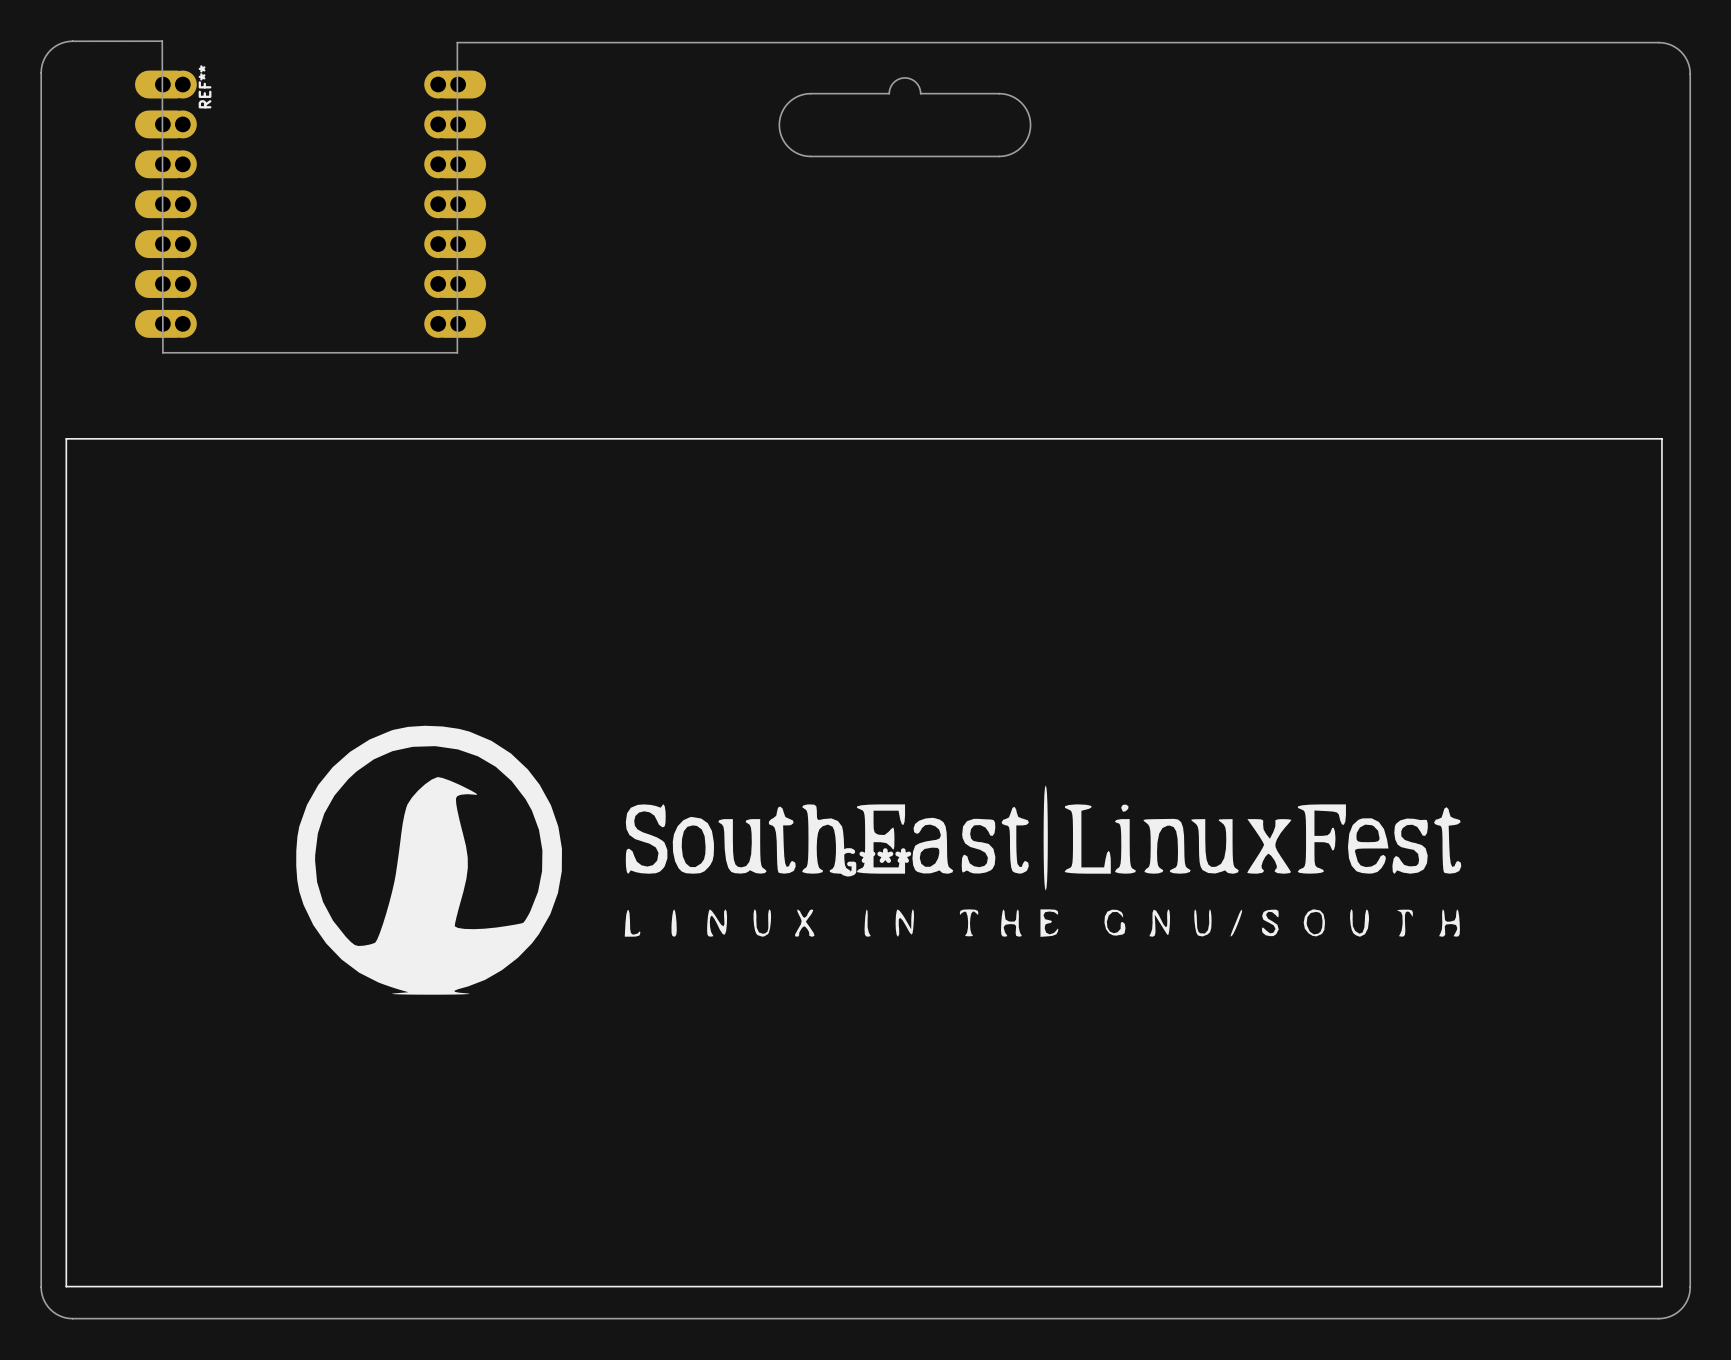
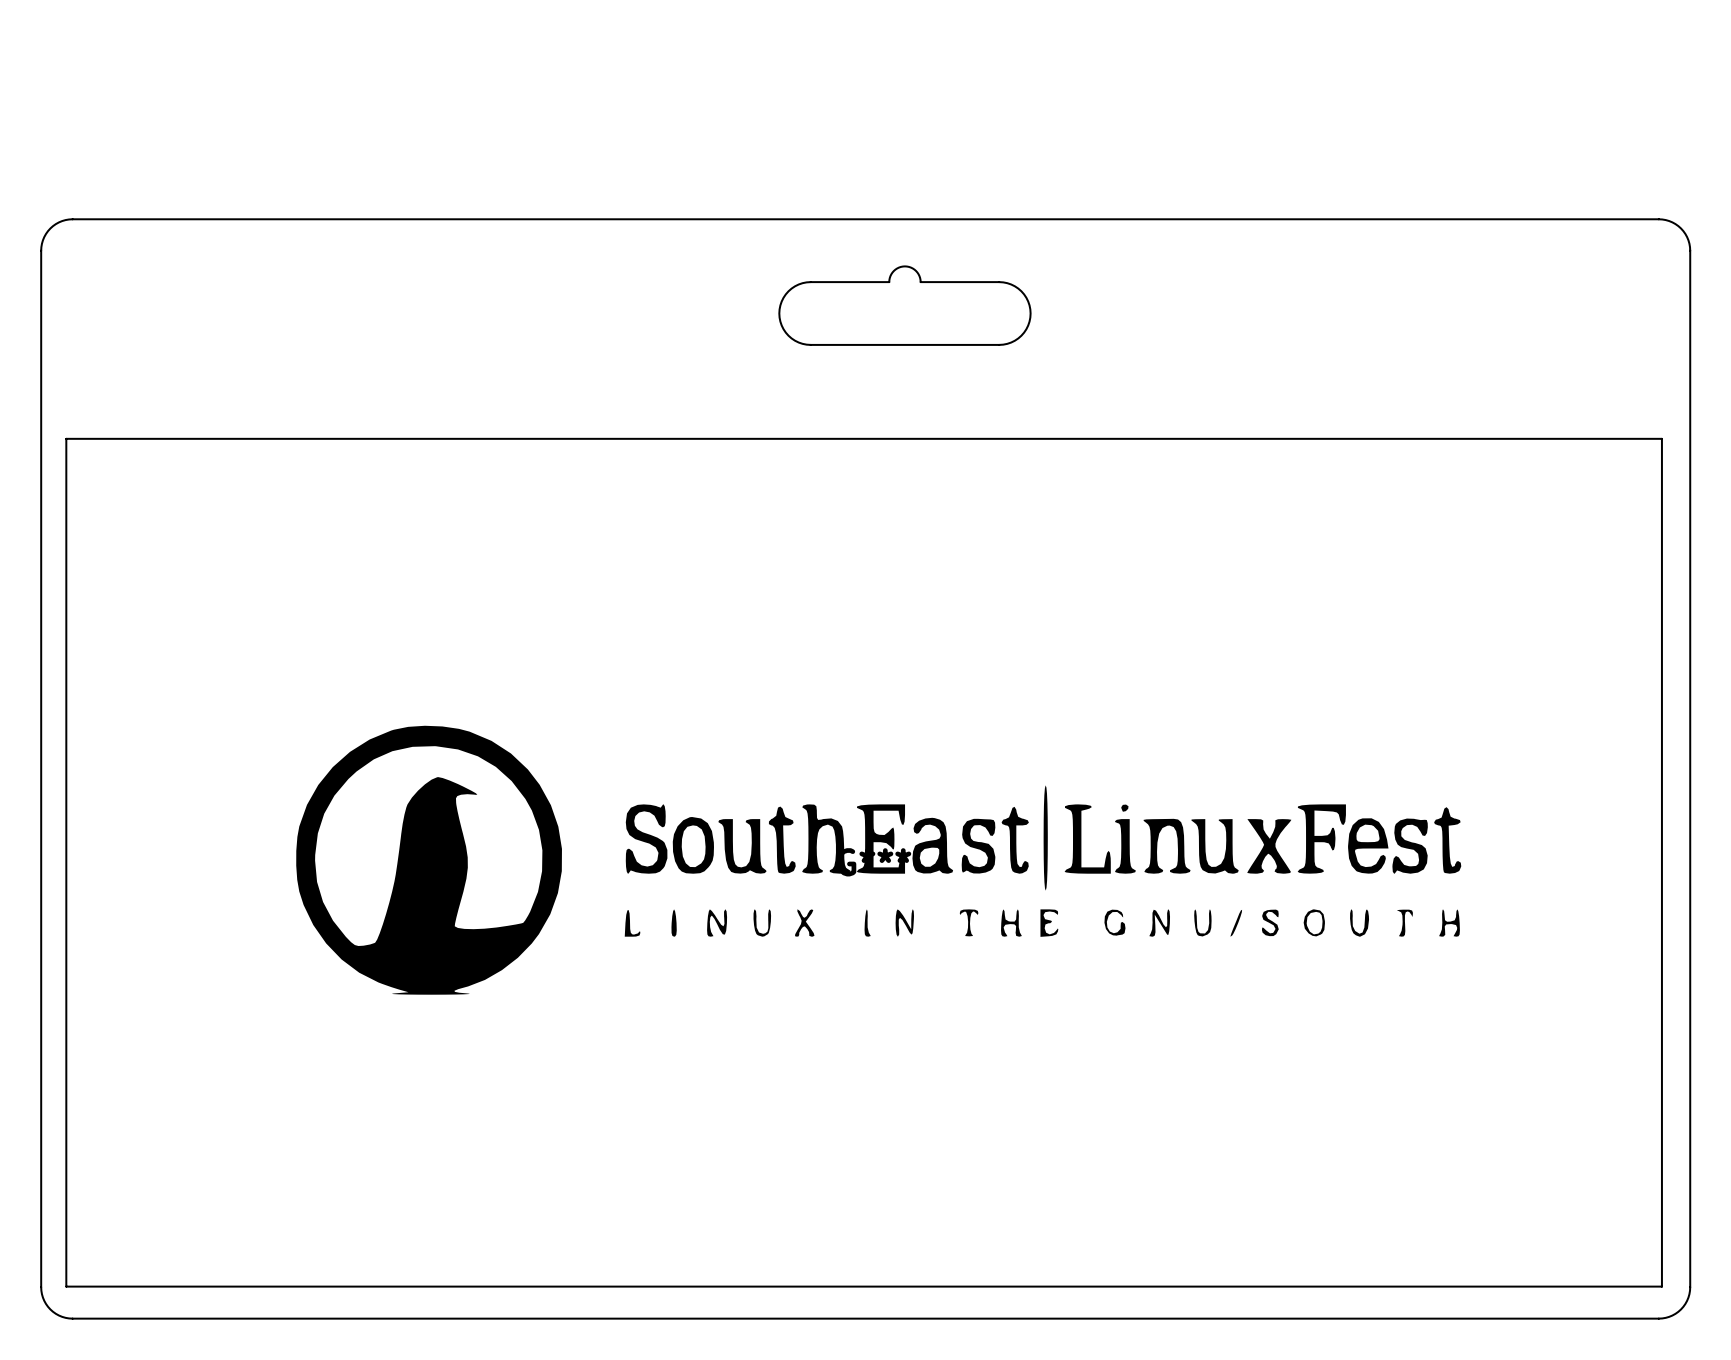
board edge: (810, 93) (889, 93) (891, 85) (895, 81) (907, 78) (917, 84) (920, 93) (999, 93) (1011, 96) (1018, 100) (1026, 109) (1029, 116) (1030, 129) (1028, 137) (1021, 147) (1014, 152) (1003, 156) (806, 156) (795, 152) (788, 147) (781, 137) (779, 125) (781, 113) (788, 102) (798, 96) (810, 93) -> (810, 282) (889, 282) (893, 270) (898, 267) (907, 266) (917, 272) (920, 282) (999, 282) (1011, 284) (1018, 288) (1026, 297) (1029, 305) (1030, 317) (1028, 325) (1021, 335) (1014, 340) (1003, 344) (806, 344) (795, 340) (788, 335) (781, 325) (779, 313) (781, 301) (788, 291) (798, 284) (810, 282)
REF**: (165, 204) -> none
part: (455, 204) -> none
board edge: (41, 250) (41, 72) (46, 55) (55, 46) (69, 41) (162, 41) (162, 352) (457, 352) (457, 42) (1662, 42) (1672, 45) (1681, 51) (1687, 60) (1690, 70) (1690, 250) -> (41, 250) (42, 240) (50, 228) (62, 221) (72, 219) (1658, 219) (1672, 222) (1681, 228) (1687, 237) (1690, 250)

